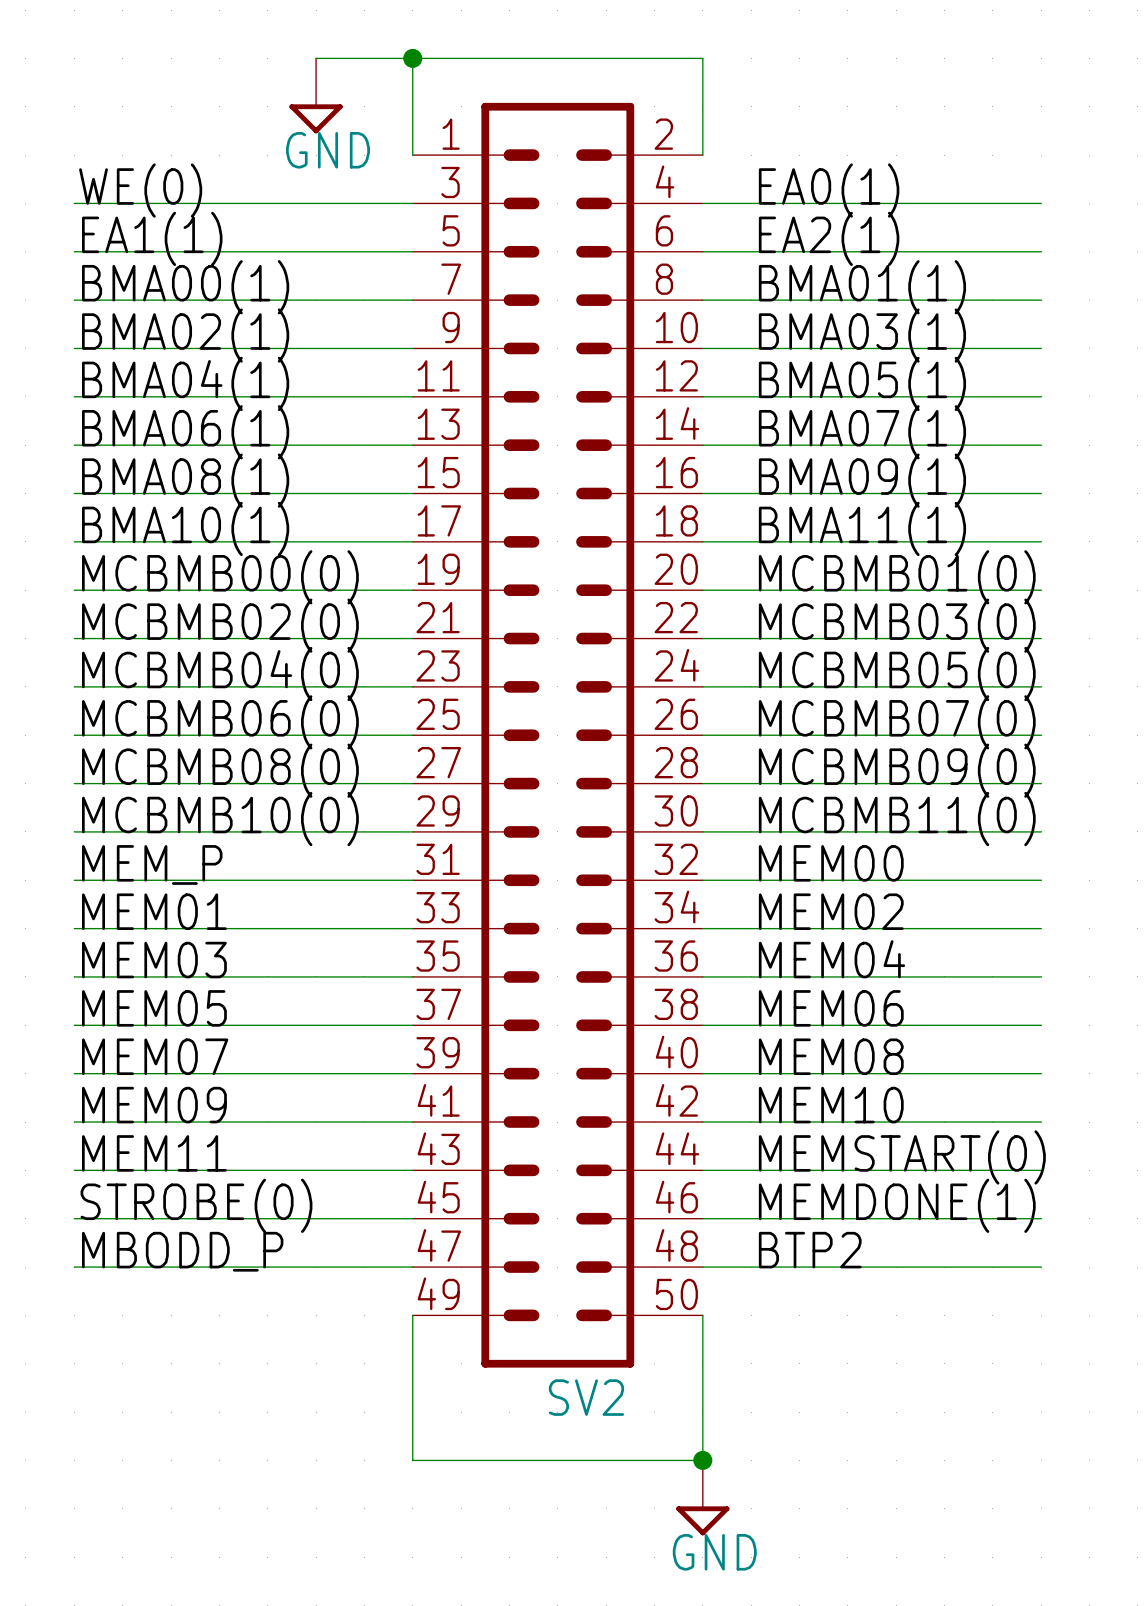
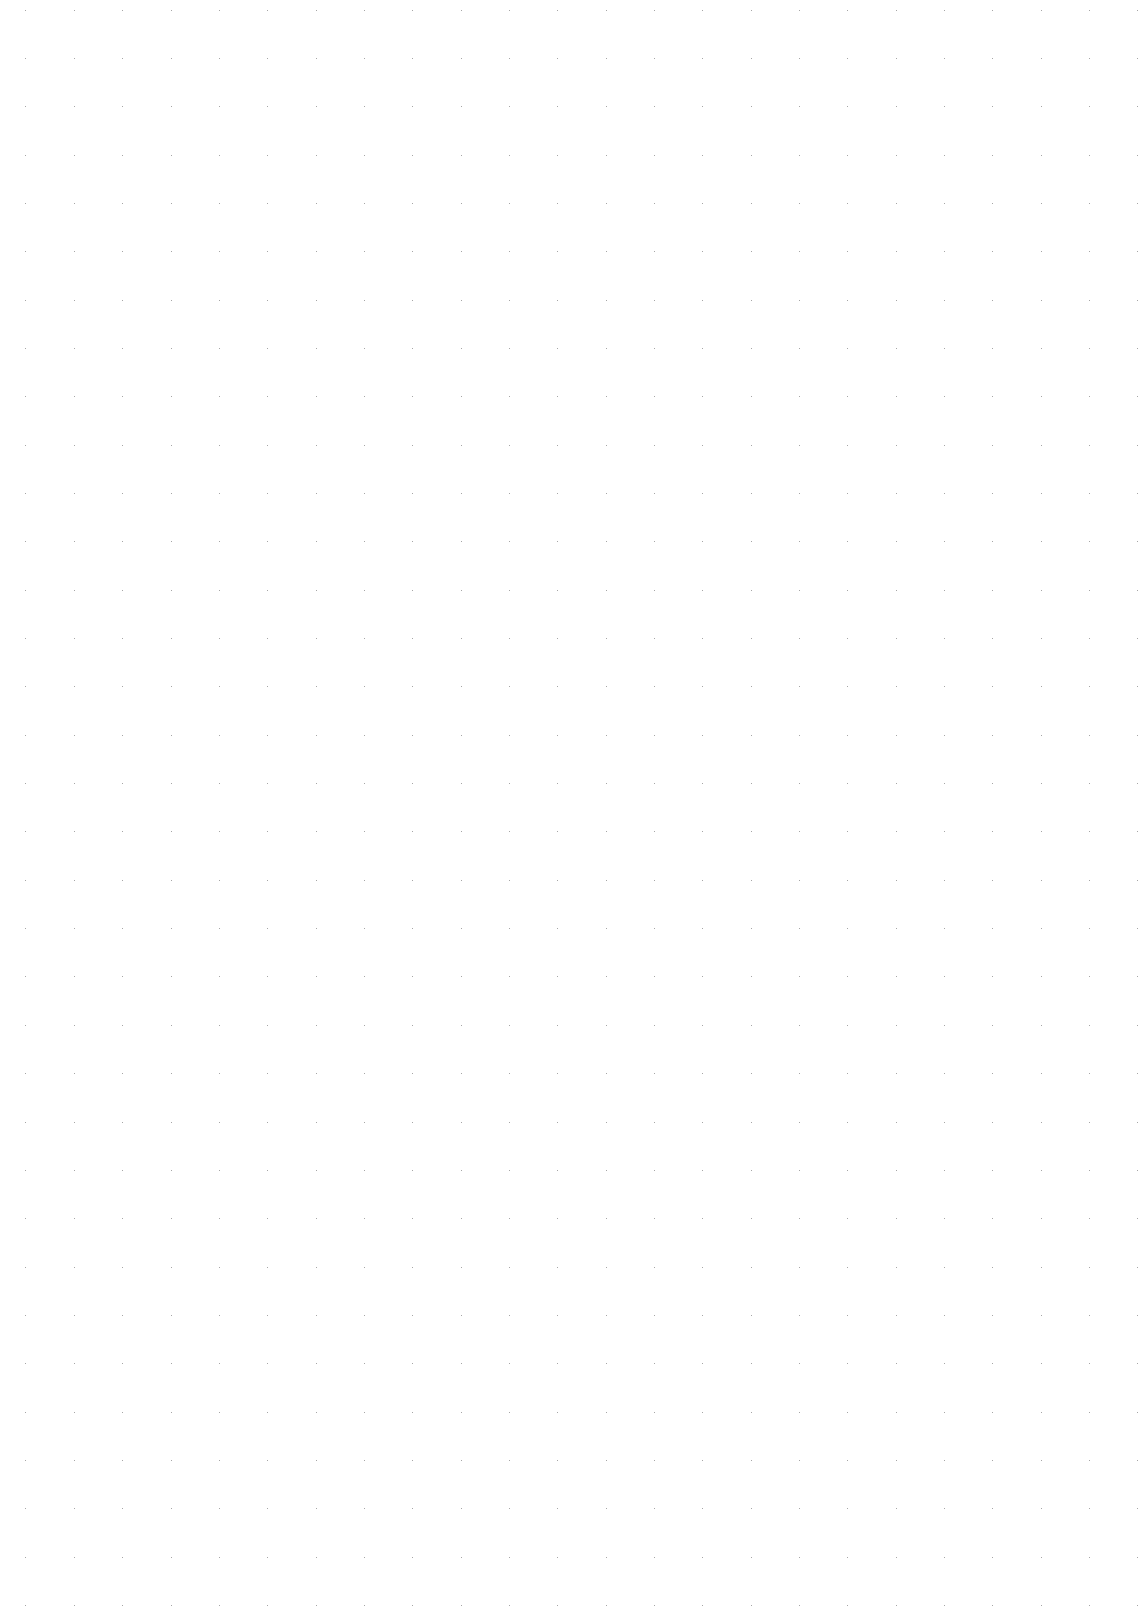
wire: (316, 58) (702, 58) (702, 155) -> none
wire: (412, 58) (412, 155) -> none
junction: (412, 58) -> none
power symbol: GND (316, 95) -> none
label: WE(0) (140, 190) -> none
label: EA0(1) (829, 190) -> none
wire: (74, 203) (412, 203) -> none
wire: (702, 203) (1041, 203) -> none
label: EA1(1) (152, 238) -> none
label: EA2(1) (829, 238) -> none
wire: (74, 251) (412, 251) -> none
wire: (702, 251) (1041, 251) -> none
label: BMA00(1) (185, 287) -> none
label: BMA01(1) (862, 287) -> none
wire: (74, 300) (412, 300) -> none
wire: (702, 300) (1041, 300) -> none
label: BMA02(1) (185, 335) -> none
label: BMA03(1) (862, 335) -> none
wire: (74, 348) (412, 348) -> none
wire: (702, 348) (1041, 348) -> none
label: BMA04(1) (185, 383) -> none
label: BMA05(1) (862, 383) -> none
wire: (74, 396) (412, 396) -> none
wire: (702, 396) (1041, 396) -> none
label: BMA06(1) (185, 432) -> none
label: BMA07(1) (862, 432) -> none
wire: (74, 445) (412, 445) -> none
wire: (702, 445) (1041, 445) -> none
label: BMA08(1) (185, 480) -> none
label: BMA09(1) (862, 480) -> none
wire: (74, 493) (412, 493) -> none
wire: (702, 493) (1041, 493) -> none
label: BMA10(1) (185, 528) -> none
label: BMA11(1) (862, 528) -> none
wire: (74, 541) (412, 541) -> none
wire: (702, 541) (1041, 541) -> none
label: MCBMB00(0) (220, 577) -> none
label: MCBMB01(0) (897, 577) -> none
wire: (74, 590) (412, 590) -> none
wire: (702, 590) (1041, 590) -> none
label: MCBMB02(0) (220, 625) -> none
label: MCBMB03(0) (897, 625) -> none
wire: (74, 638) (412, 638) -> none
wire: (702, 638) (1041, 638) -> none
label: MCBMB04(0) (220, 674) -> none
label: MCBMB05(0) (897, 674) -> none
wire: (74, 686) (412, 686) -> none
wire: (702, 686) (1041, 686) -> none
label: MCBMB06(0) (220, 722) -> none
label: MCBMB07(0) (897, 722) -> none
wire: (74, 735) (412, 735) -> none
SV2: (557, 735) -> none
wire: (702, 735) (1041, 735) -> none
label: MCBMB08(0) (220, 770) -> none
label: MCBMB09(0) (897, 770) -> none
wire: (74, 783) (412, 783) -> none
wire: (702, 783) (1041, 783) -> none
label: MCBMB10(0) (220, 819) -> none
label: MCBMB11(0) (897, 819) -> none
wire: (74, 831) (412, 831) -> none
wire: (702, 831) (1041, 831) -> none
label: MEM00 (831, 863) -> none
label: MEM_P (152, 864) -> none
wire: (74, 880) (412, 880) -> none
wire: (702, 880) (1041, 880) -> none
label: MEM01 (154, 911) -> none
label: MEM02 (831, 911) -> none
wire: (74, 928) (412, 928) -> none
wire: (702, 928) (1041, 928) -> none
label: MEM04 (831, 959) -> none
label: MEM03 (154, 960) -> none
wire: (74, 976) (412, 976) -> none
wire: (702, 976) (1041, 976) -> none
label: MEM05 (154, 1008) -> none
label: MEM06 (831, 1008) -> none
wire: (74, 1025) (412, 1025) -> none
wire: (702, 1025) (1041, 1025) -> none
label: MEM07 (155, 1056) -> none
label: MEM08 (831, 1056) -> none
wire: (74, 1073) (412, 1073) -> none
wire: (702, 1073) (1041, 1073) -> none
label: MEM09 (154, 1105) -> none
label: MEM10 (831, 1105) -> none
wire: (74, 1122) (412, 1122) -> none
wire: (702, 1122) (1041, 1122) -> none
label: MEM11 (154, 1153) -> none
label: MEMSTART(0) (902, 1157) -> none
wire: (74, 1170) (412, 1170) -> none
wire: (702, 1170) (1041, 1170) -> none
label: STROBE(0) (196, 1205) -> none
label: MEMDONE(1) (897, 1205) -> none
wire: (74, 1218) (412, 1218) -> none
wire: (702, 1218) (1041, 1218) -> none
label: BTP2 (810, 1250) -> none
label: MBODD_P (182, 1251) -> none
wire: (74, 1267) (412, 1267) -> none
wire: (702, 1267) (1041, 1267) -> none
wire: (412, 1315) (412, 1460) (702, 1460) (702, 1315) -> none
junction: (702, 1460) -> none
power symbol: GND (702, 1497) -> none

